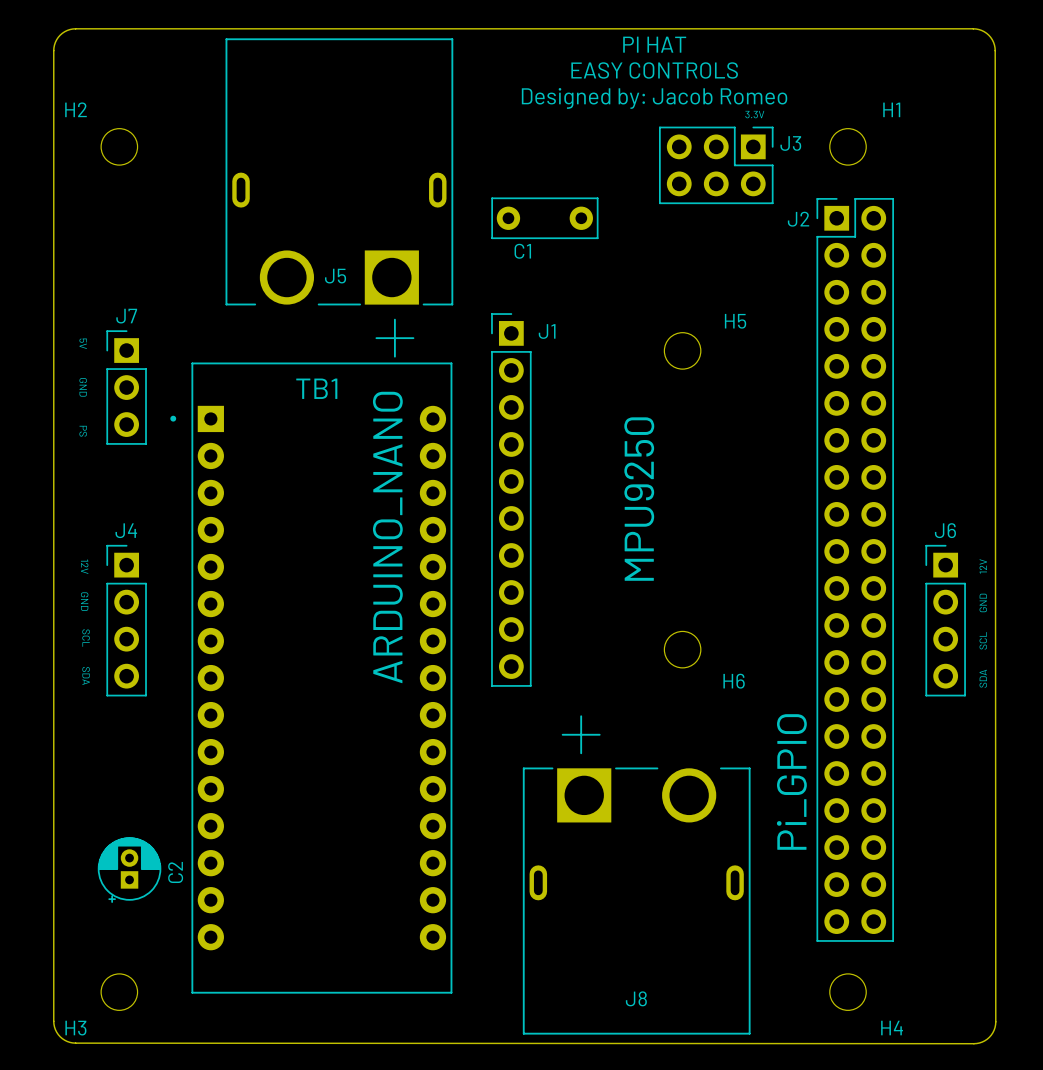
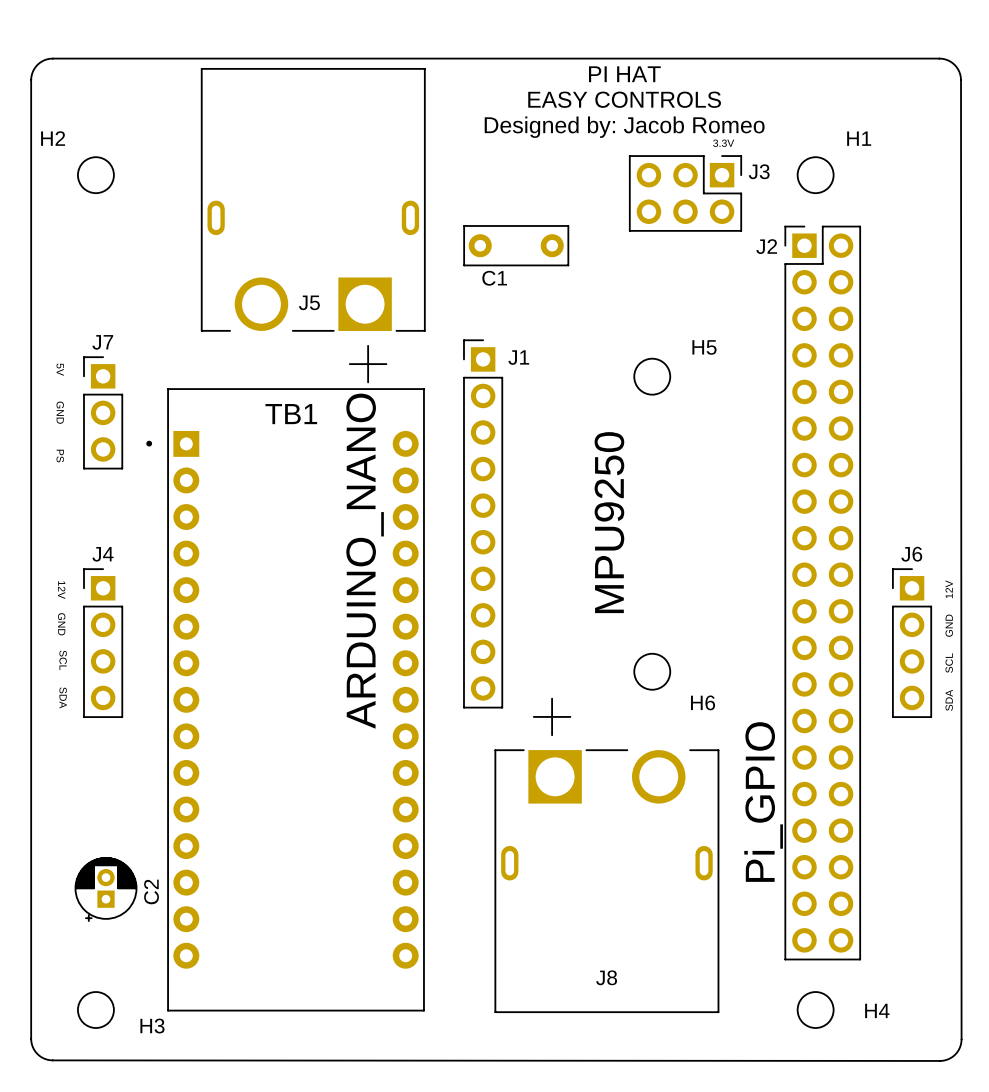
J8 position: (636, 874) -> (606, 855)
H3 name position: H3 (75, 1028) -> H3 (152, 1026)
H4 name position: H4 (892, 1028) -> H4 (877, 1010)

